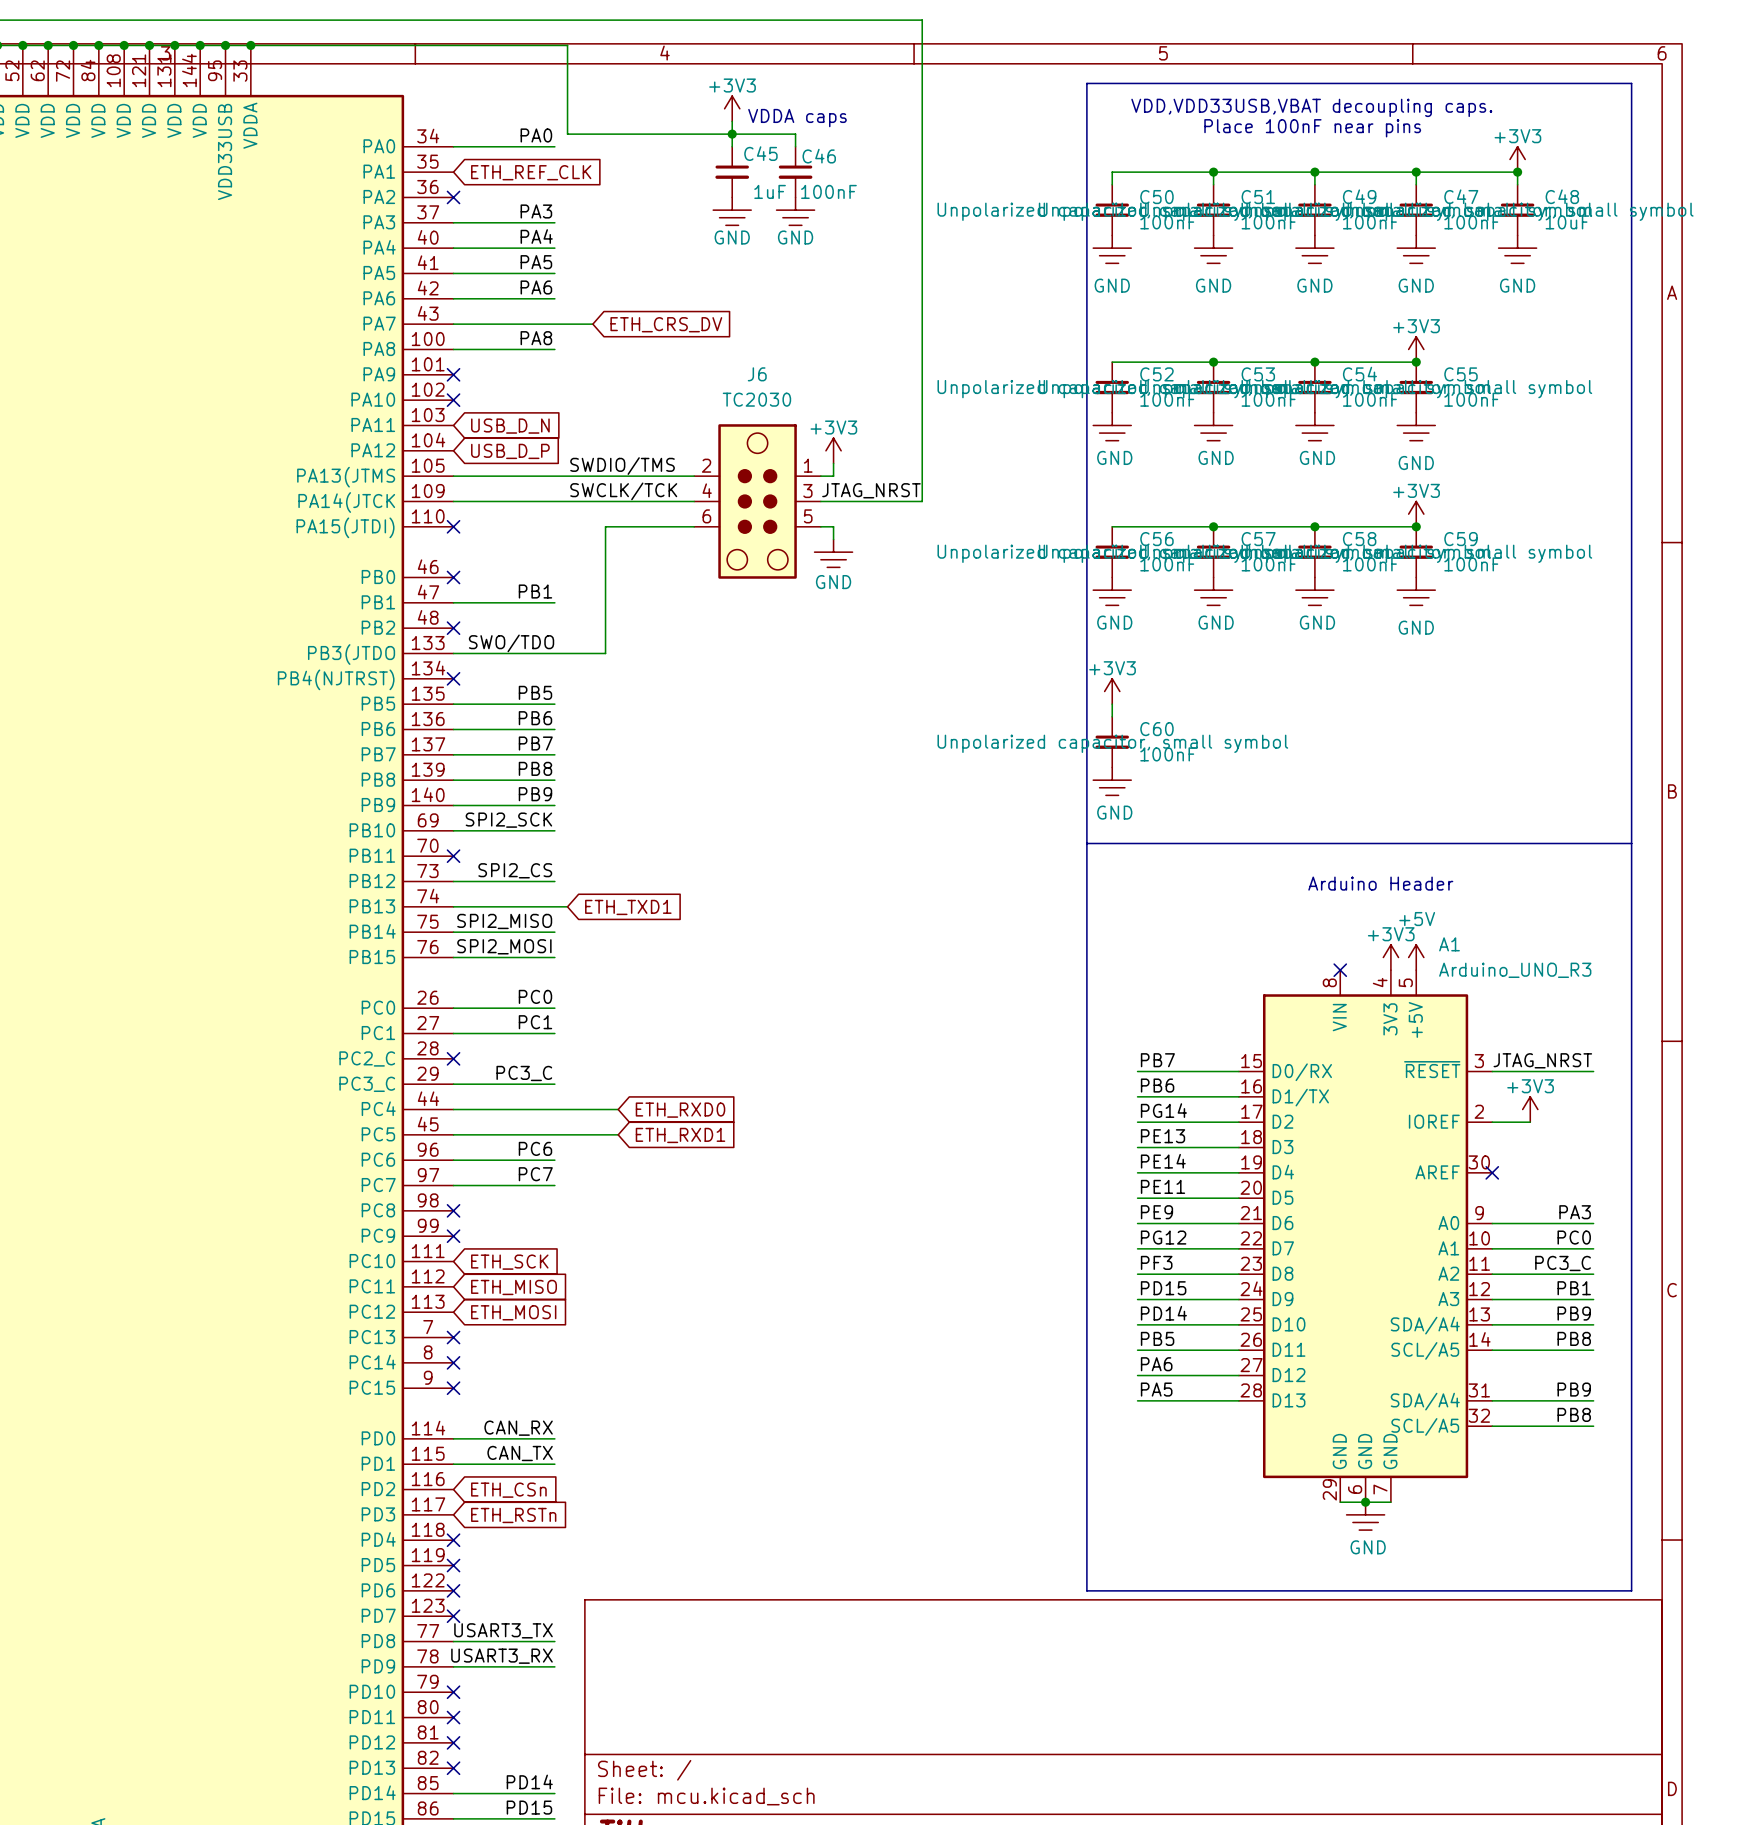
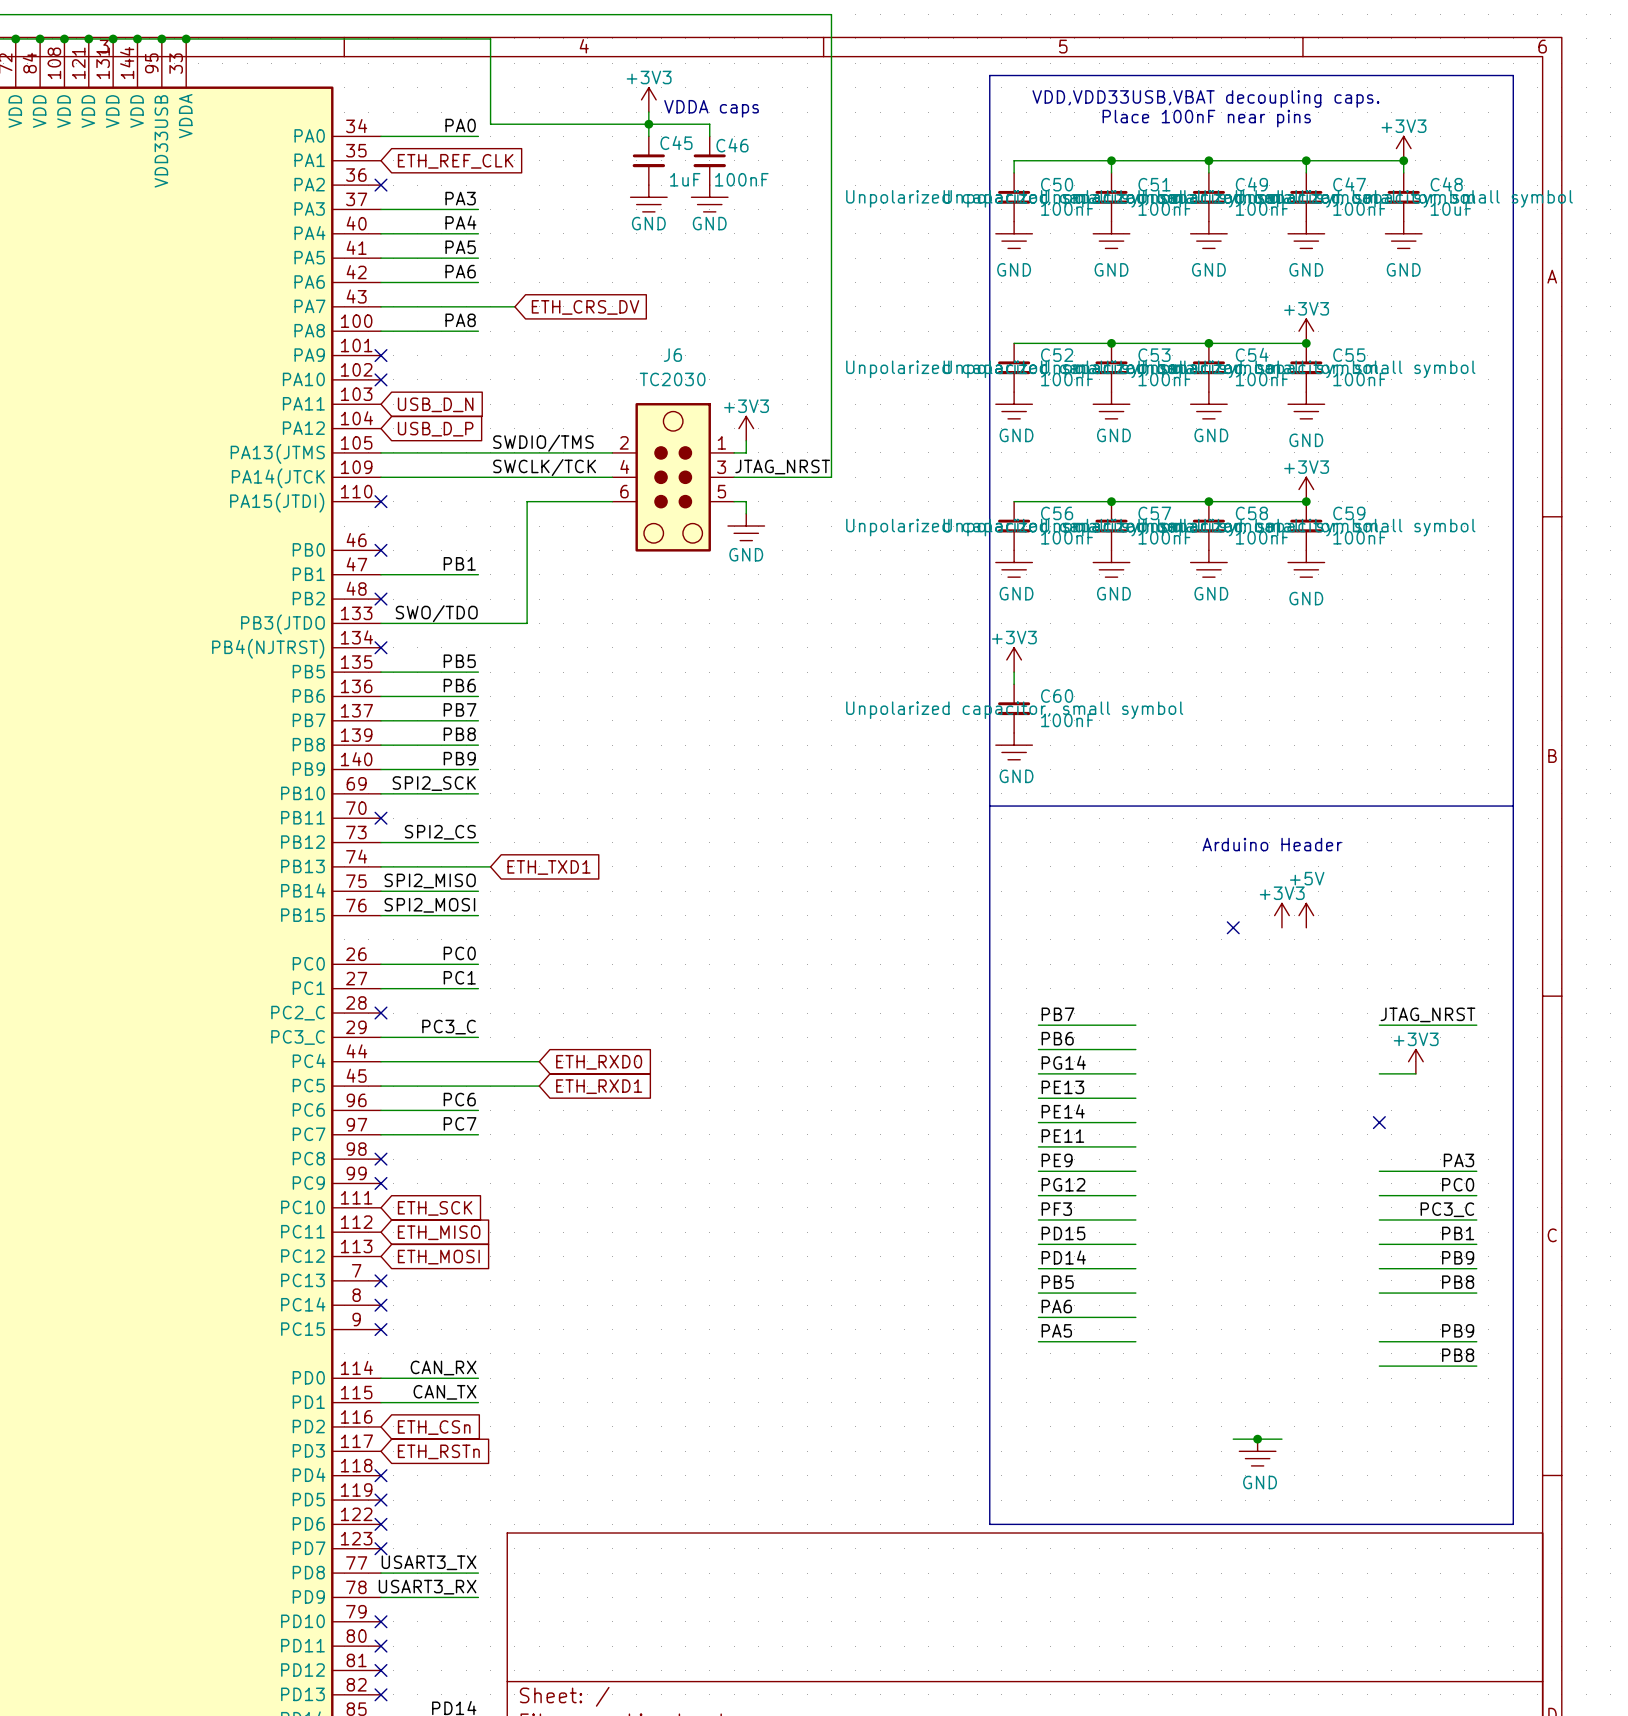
A1: Arduino_UNO_R3 (1365, 1236) -> none

